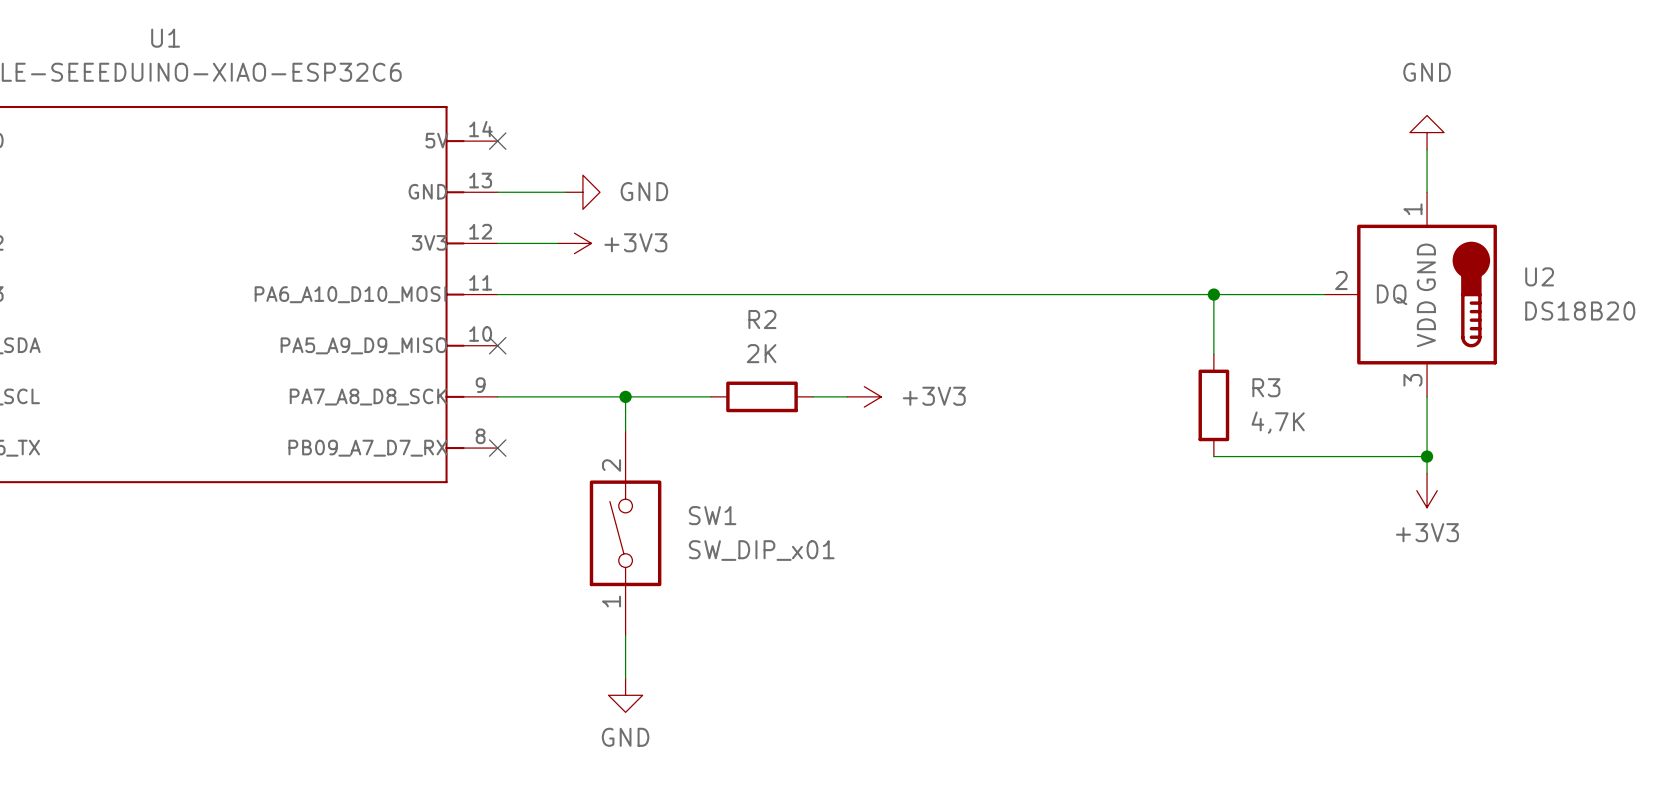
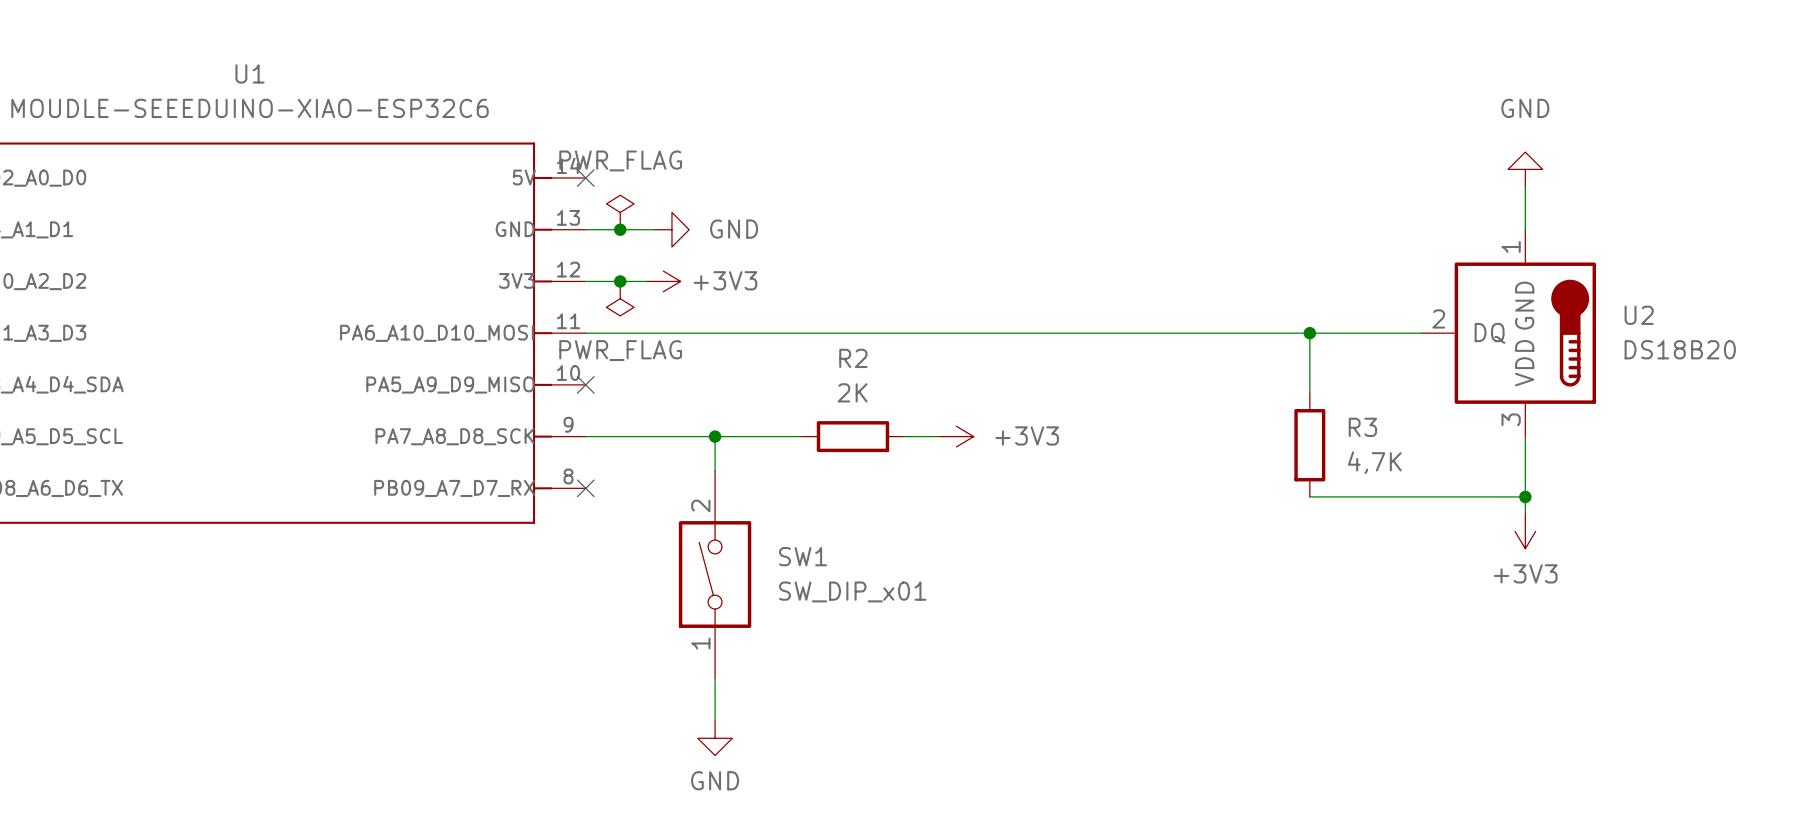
power symbol: none -> PWR_FLAG (620, 212)
junction: none -> (620, 229)
junction: none -> (620, 281)
power symbol: none -> PWR_FLAG (620, 298)

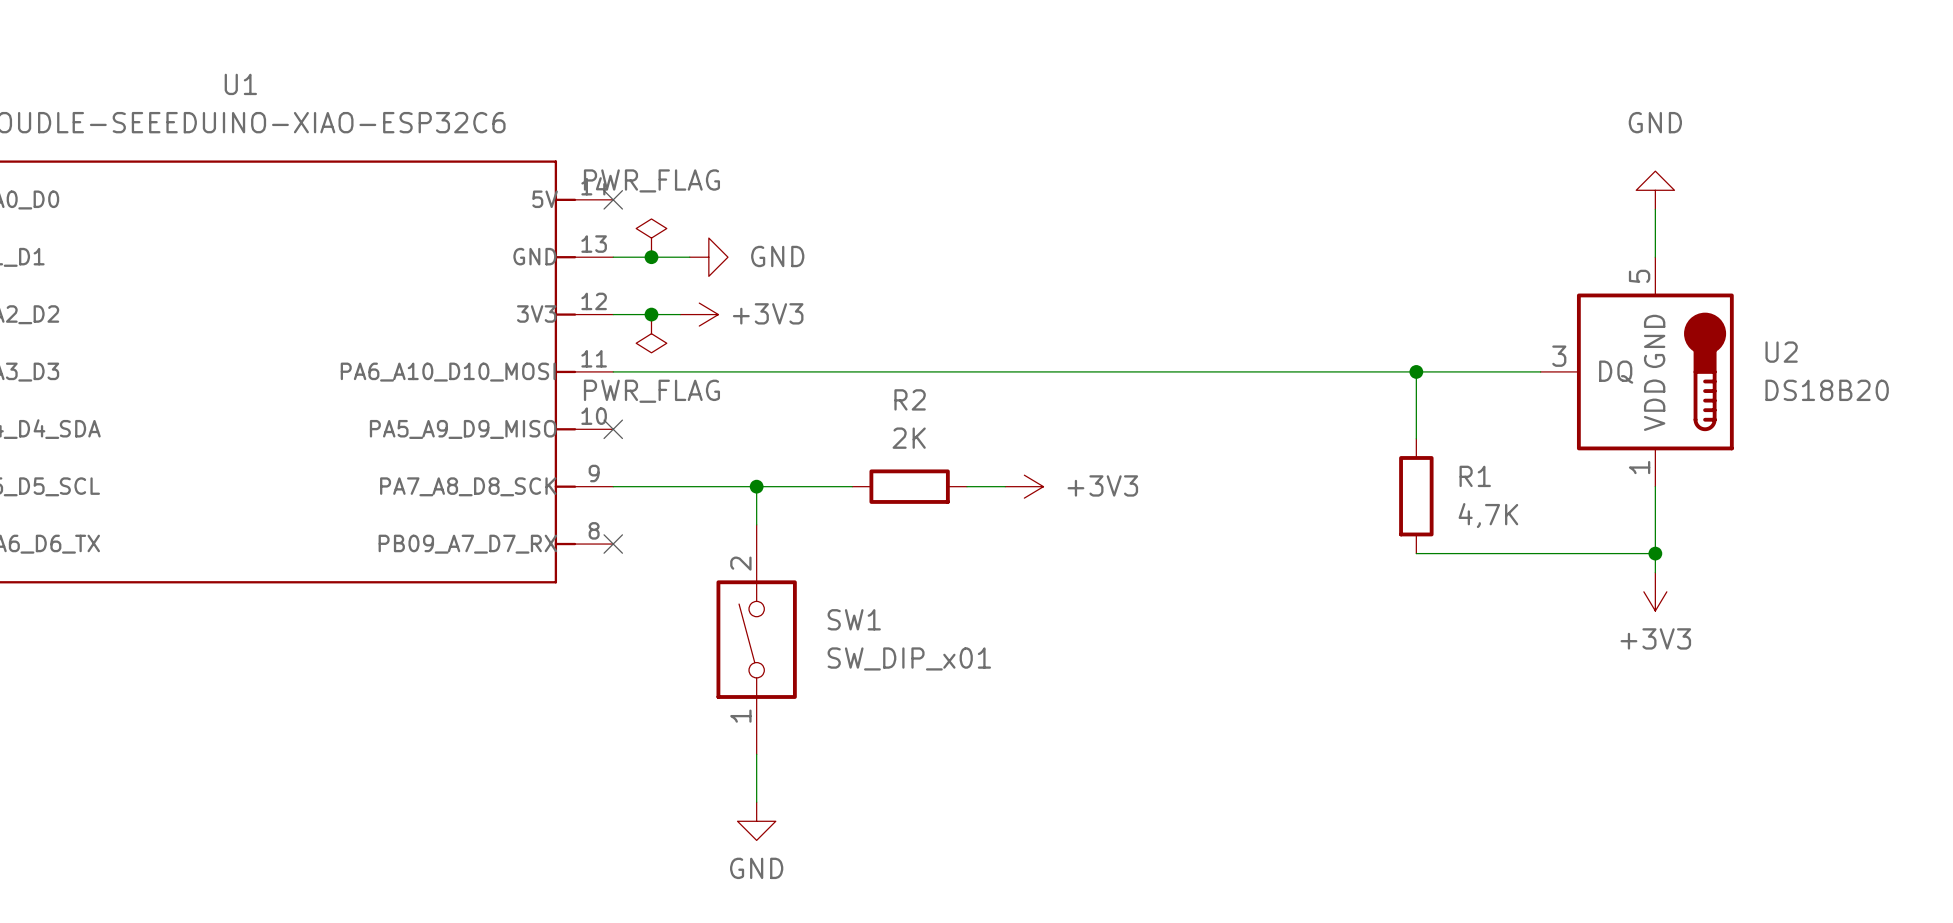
U2 pin number: 1 (1511, 246) -> 5 (1639, 276)
U2 pin number: 2 (1438, 318) -> 3 (1559, 356)
U2 pin number: 3 (1511, 419) -> 1 (1639, 467)
R3 name: R3 (1362, 427) -> R1 (1475, 476)

